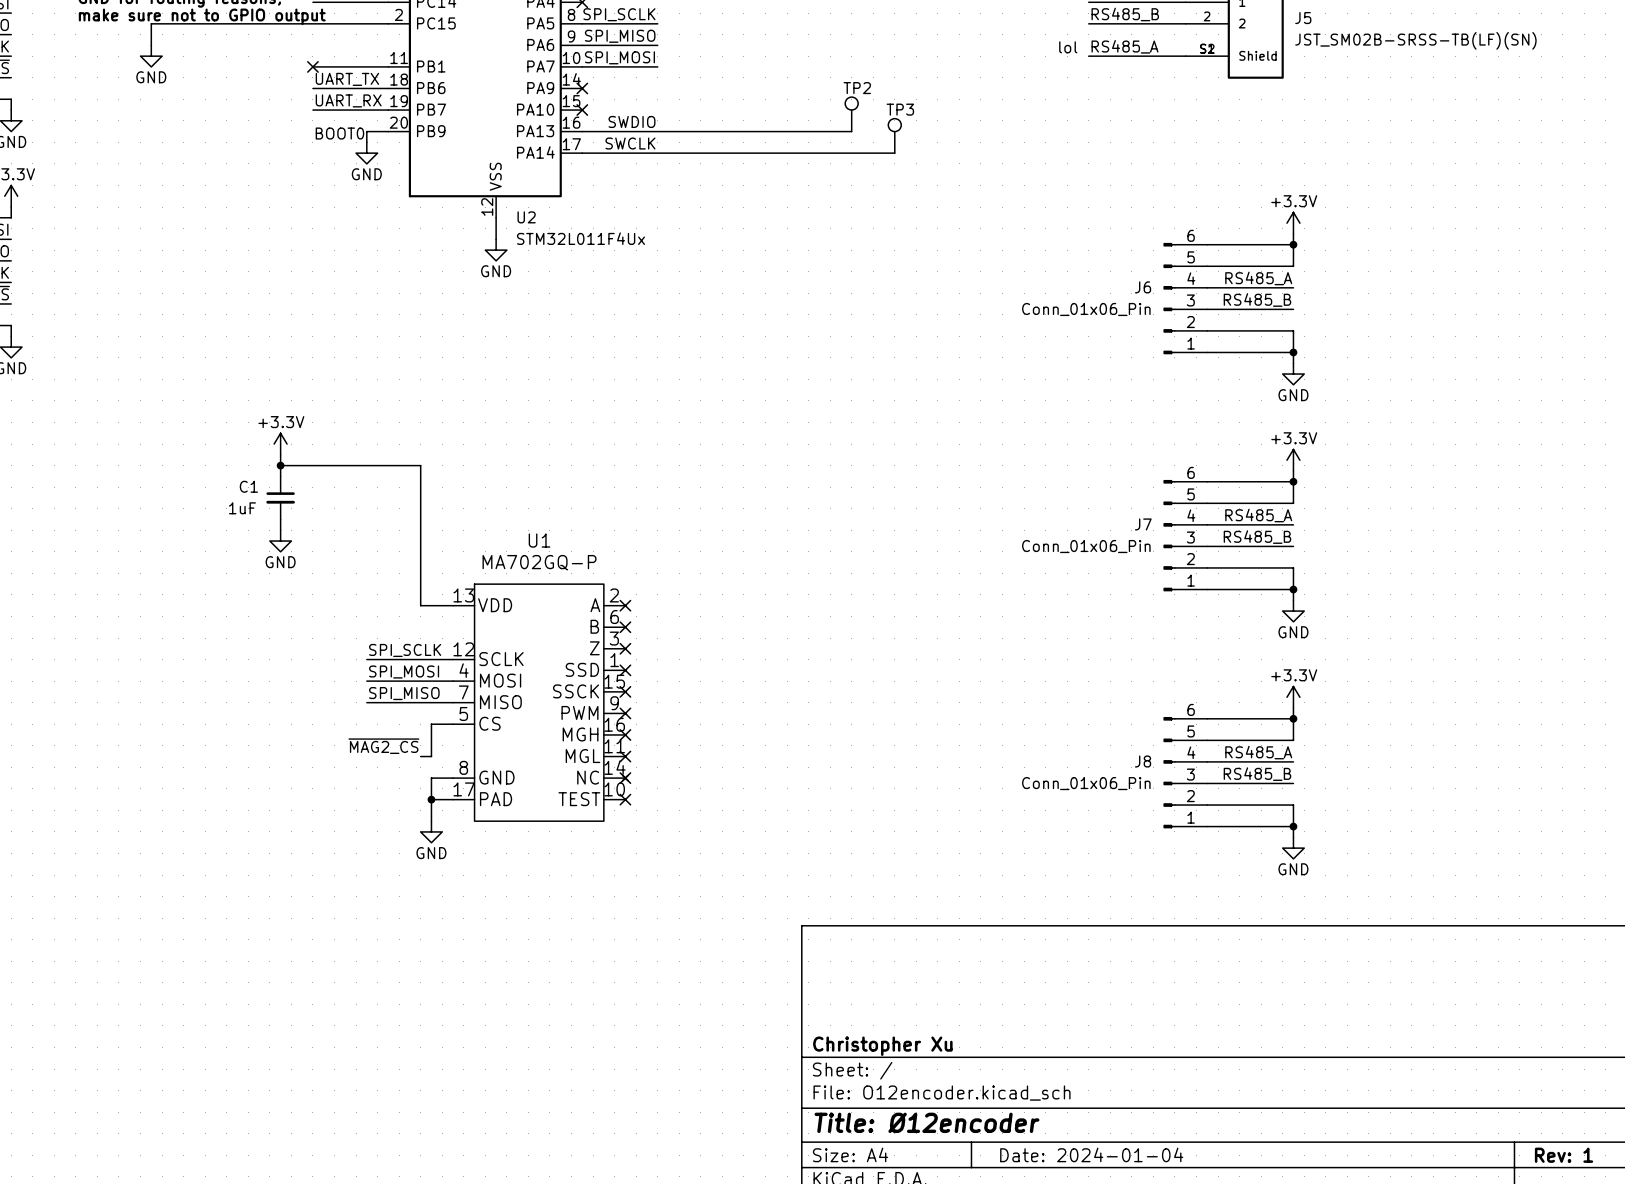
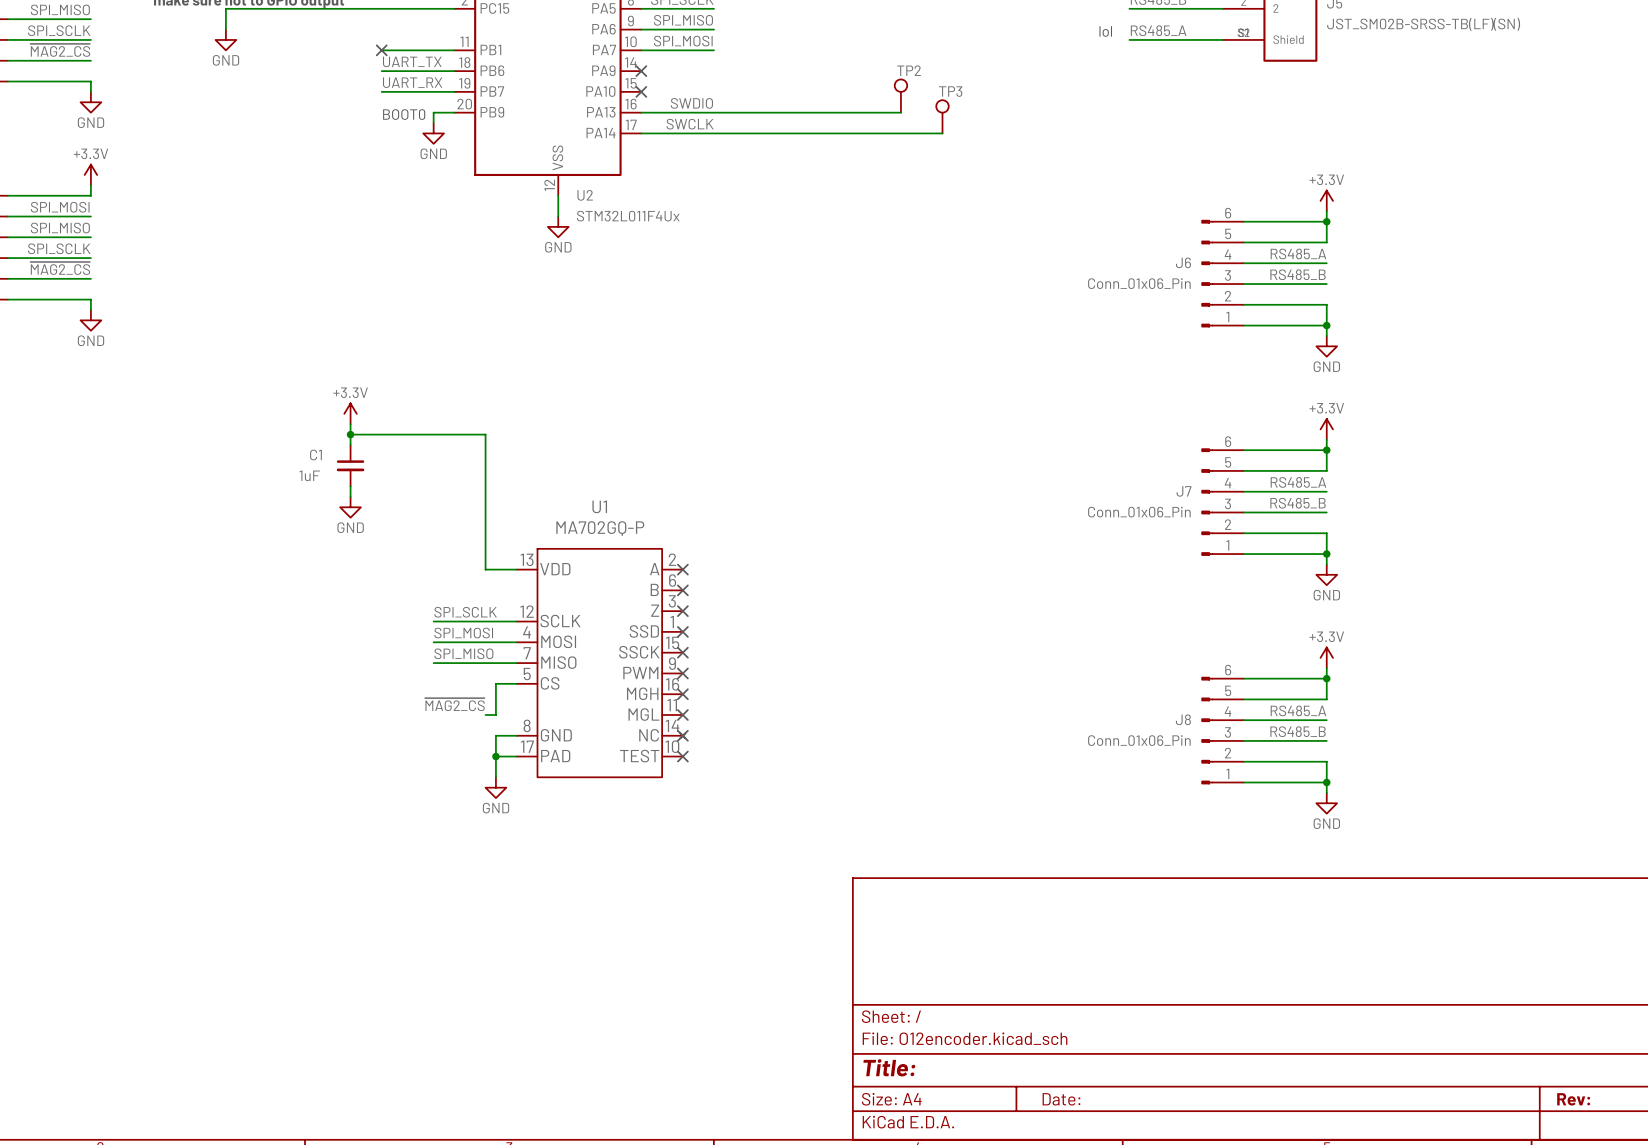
title block: Christopher Xu (882, 1046) -> none
title block: Title: Ø12encoder (927, 1122) -> Title: (889, 1067)
title block: Date: 2024-01-04 (1091, 1154) -> Date: (1061, 1099)
title block: Rev: 1 (1564, 1155) -> Rev: (1573, 1099)

